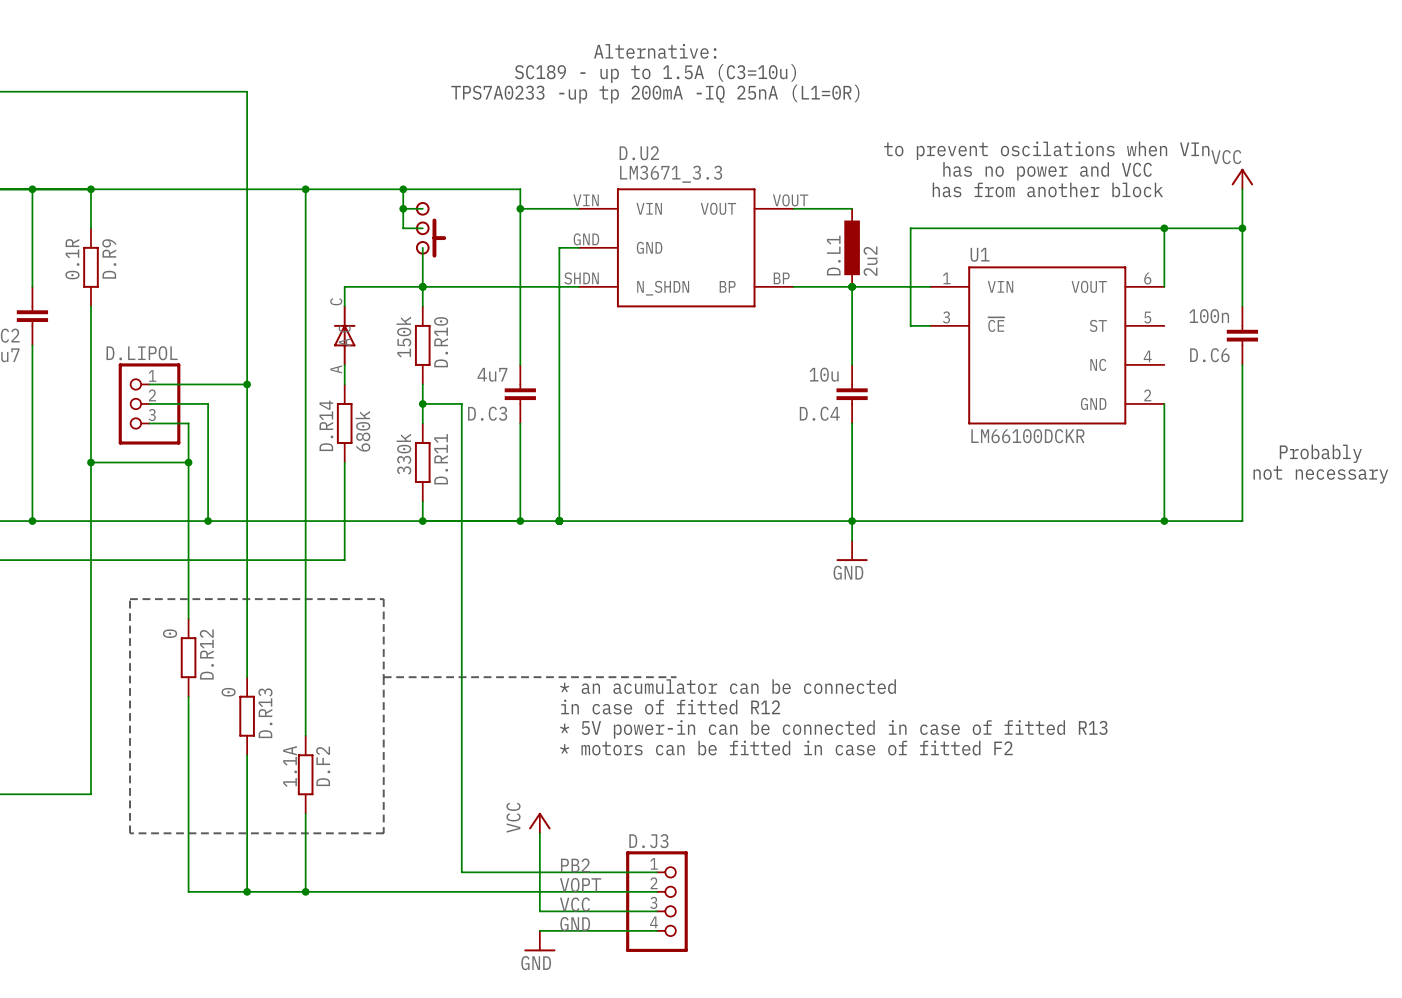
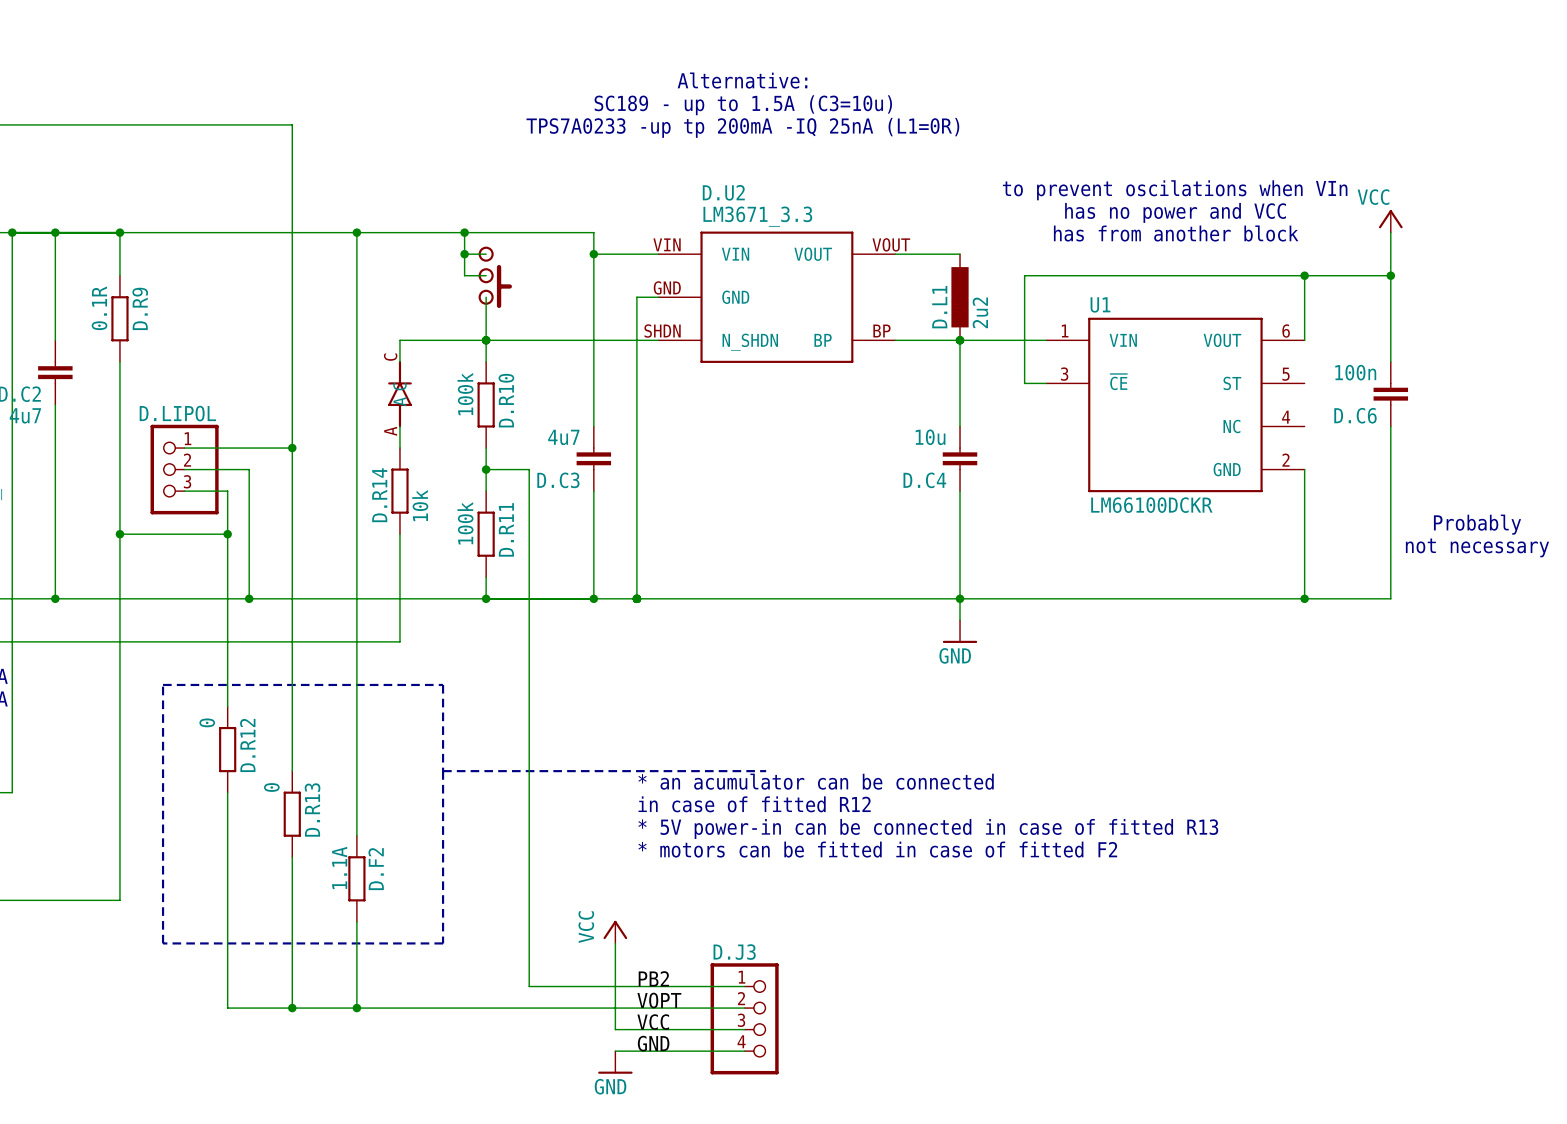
part symbol: [333, 305, 356, 366] -> [388, 360, 412, 428]
D.R10 value: 150k (403, 337) -> 100k (465, 394)
D.R14 value: 680k (362, 431) -> 10k (420, 505)
D.R11 value: 330k (403, 454) -> 100k (465, 523)

